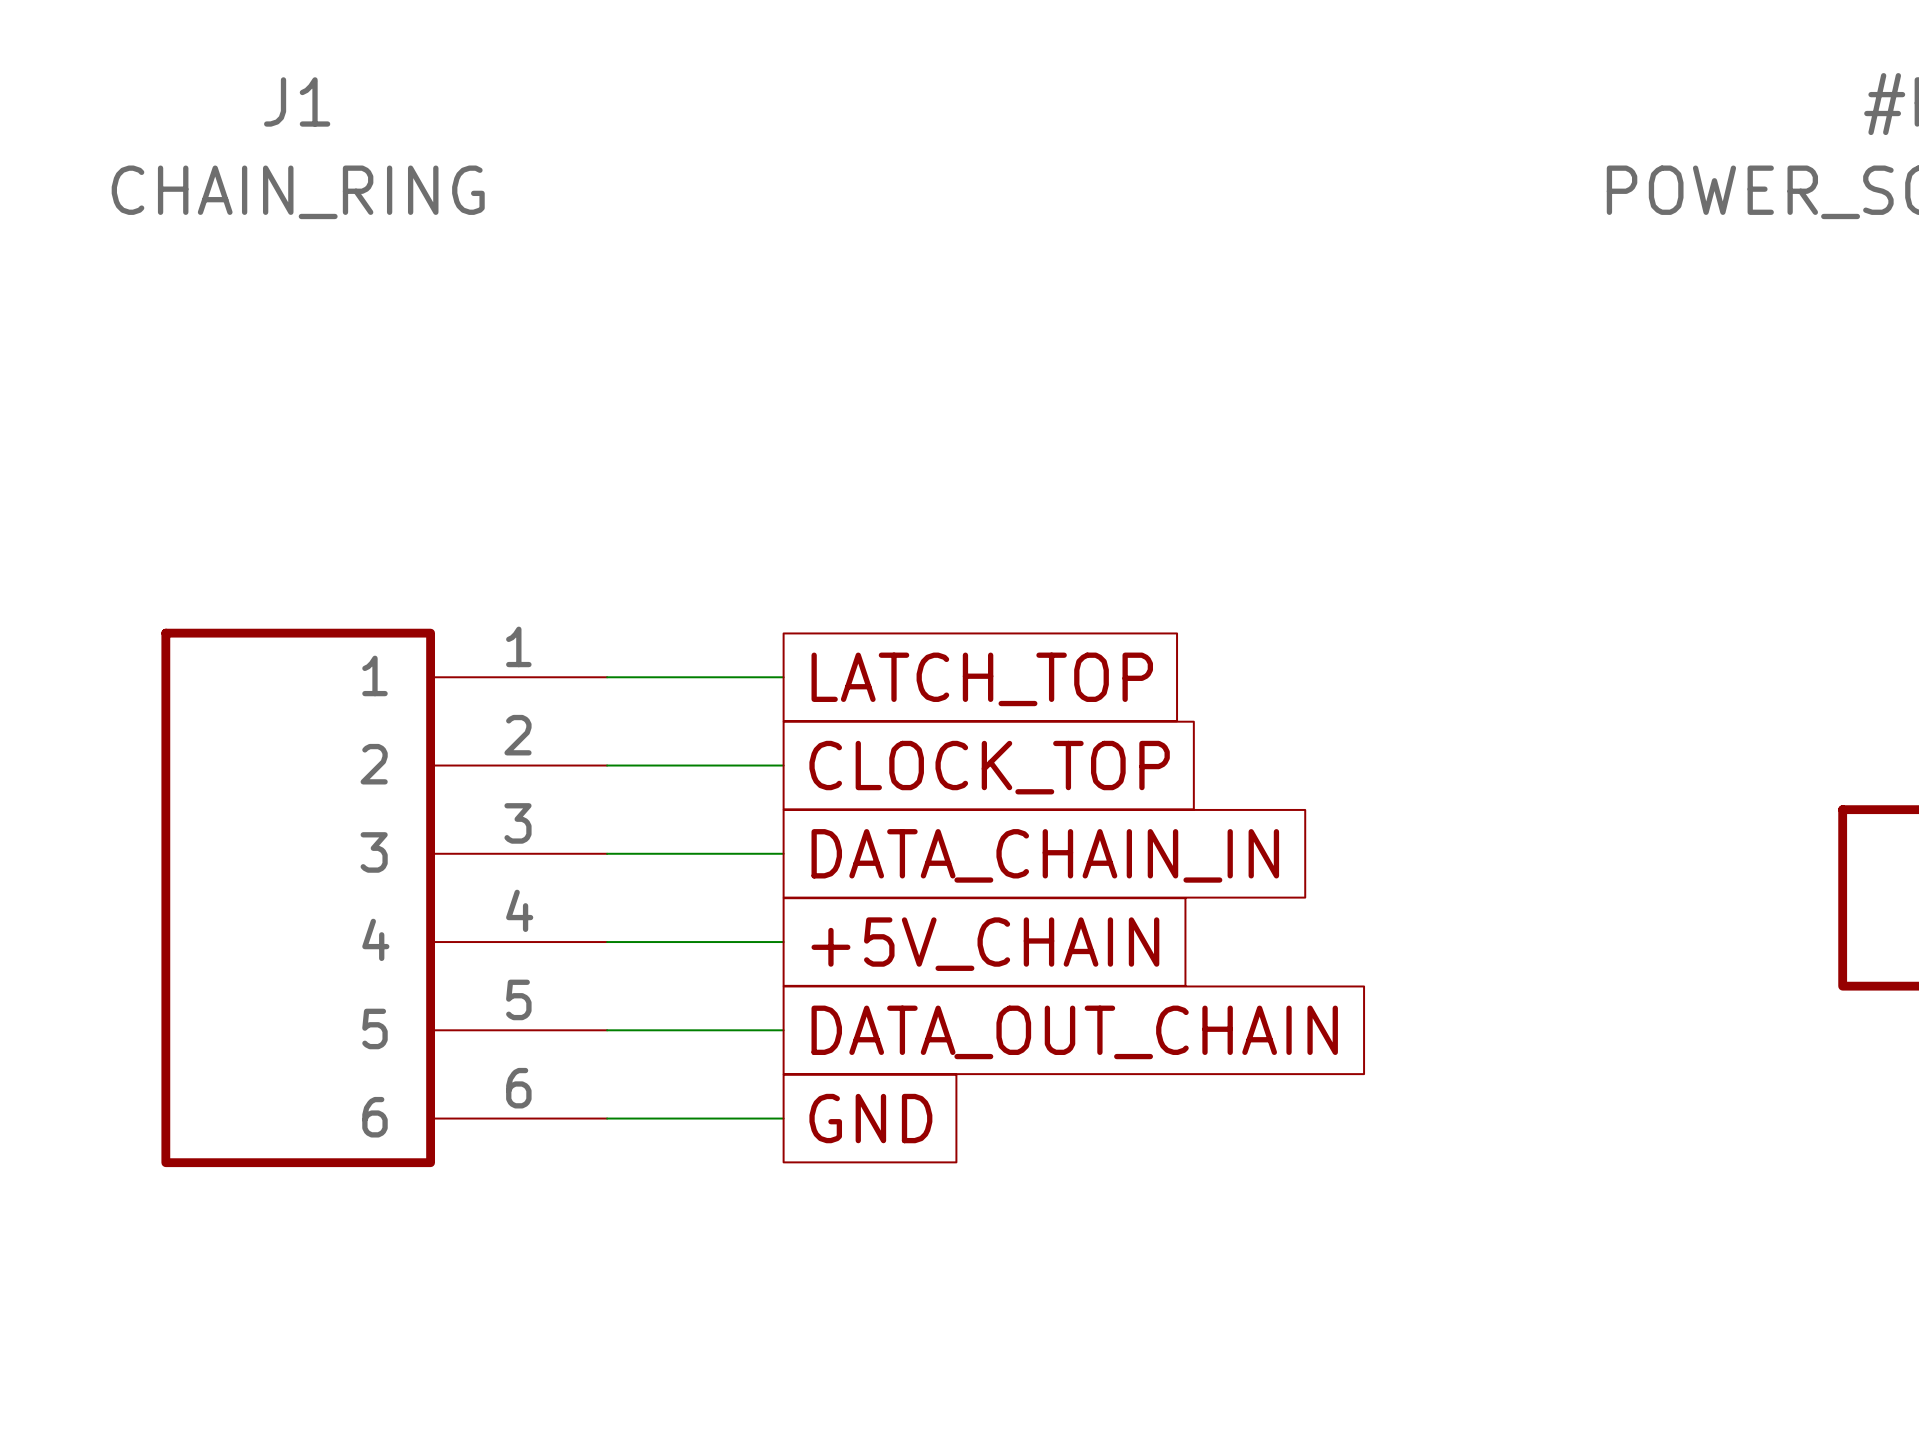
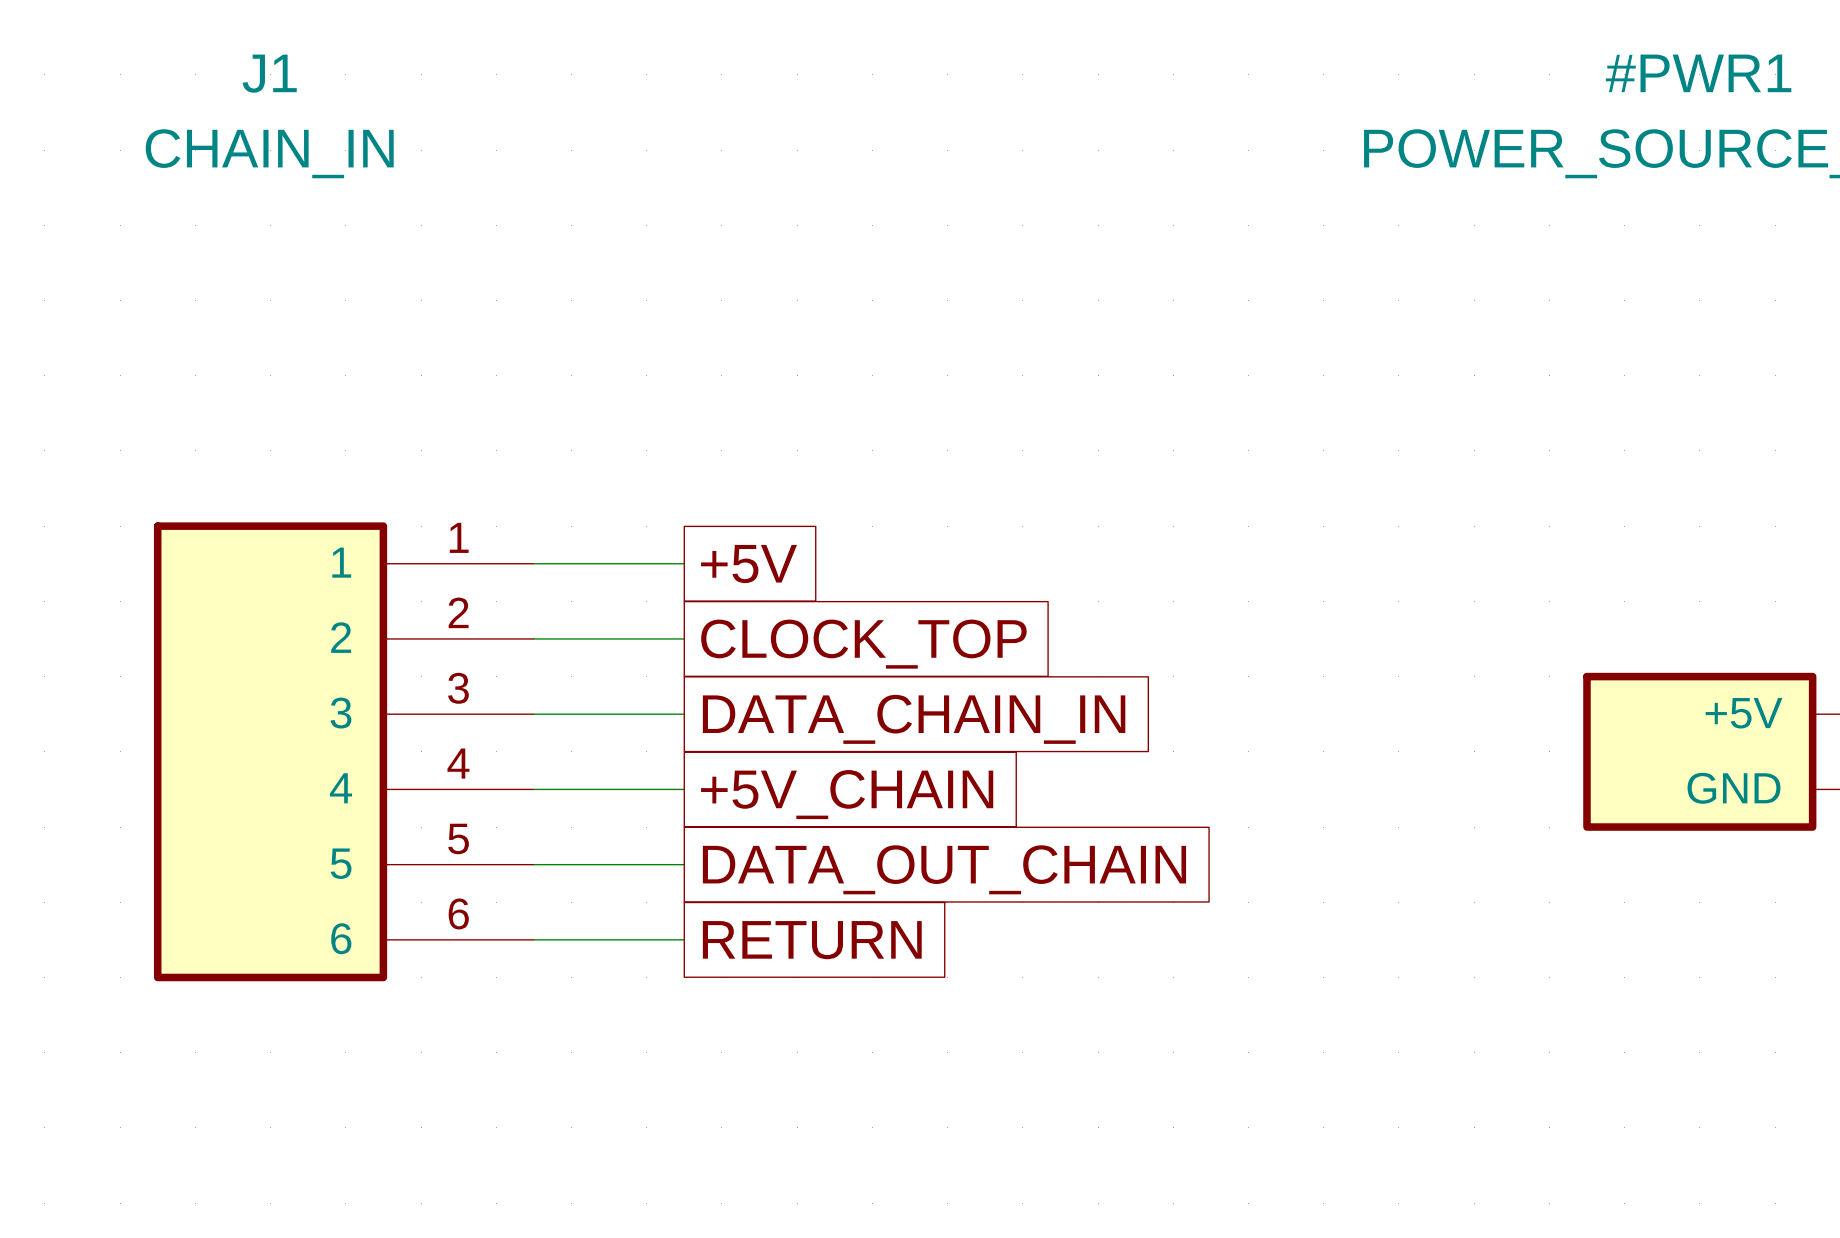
J1 value: CHAIN_RING (298, 192) -> CHAIN_IN (269, 153)
global label: LATCH_TOP (982, 679) -> +5V (749, 564)
global label: GND (870, 1118) -> RETURN (812, 940)

